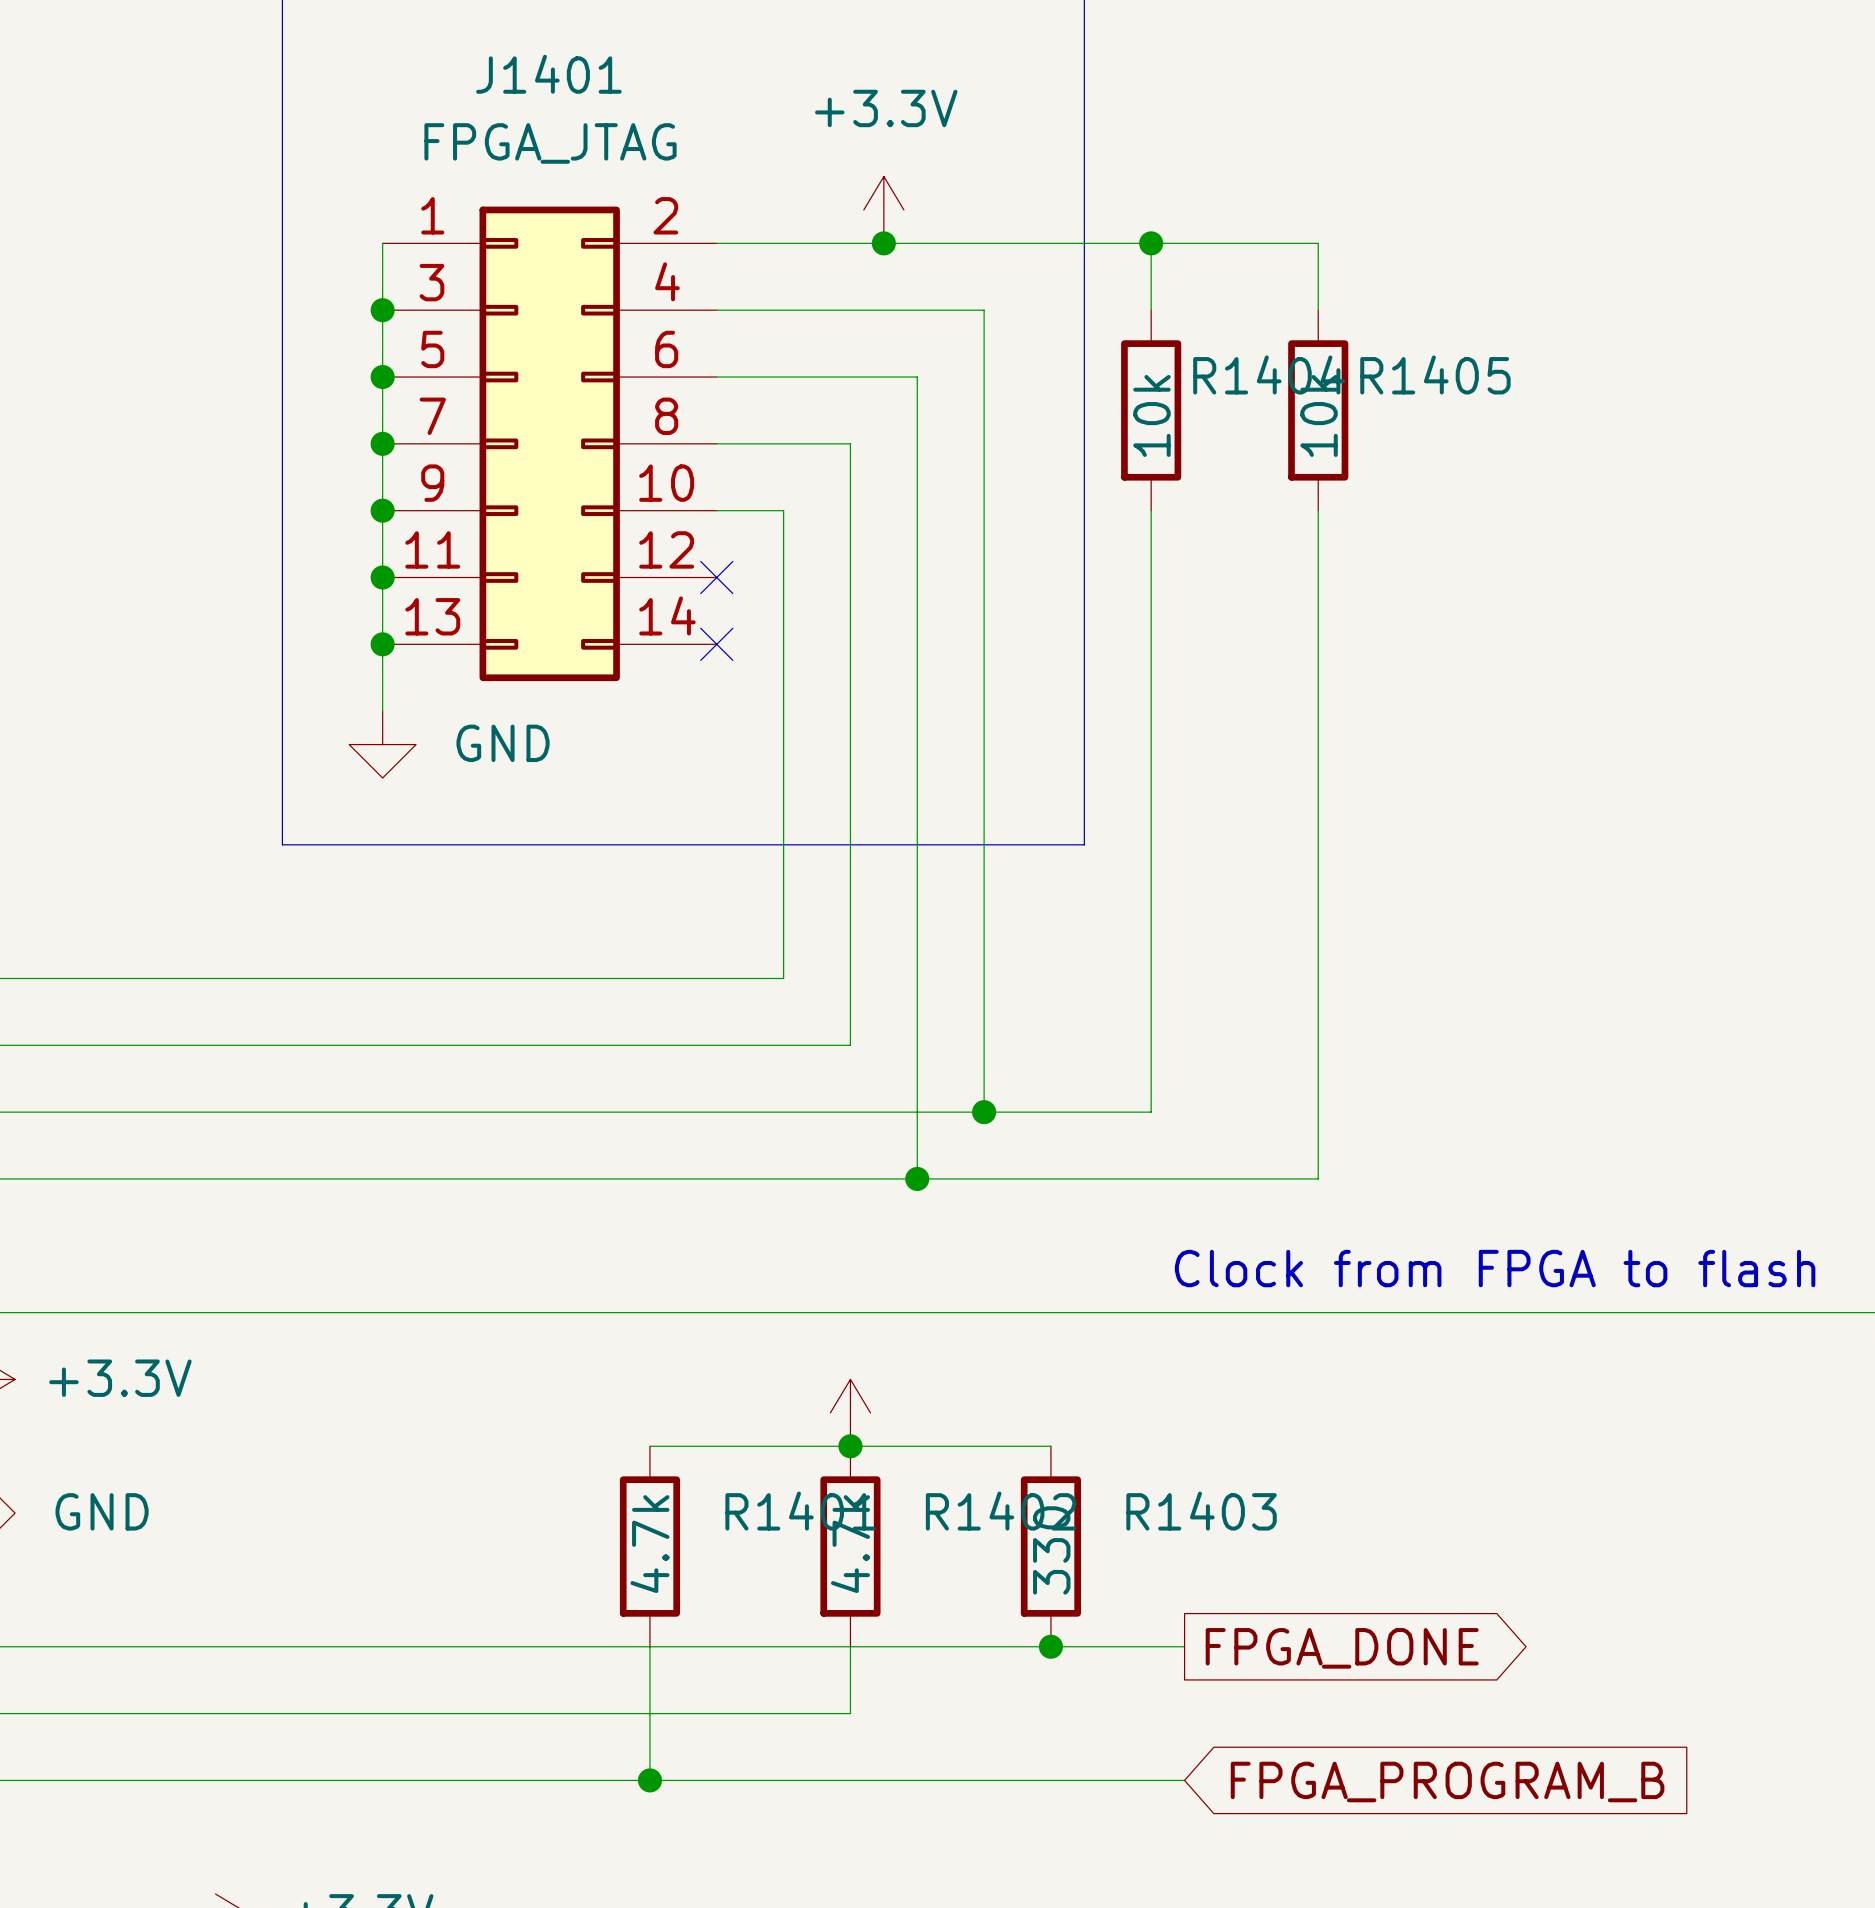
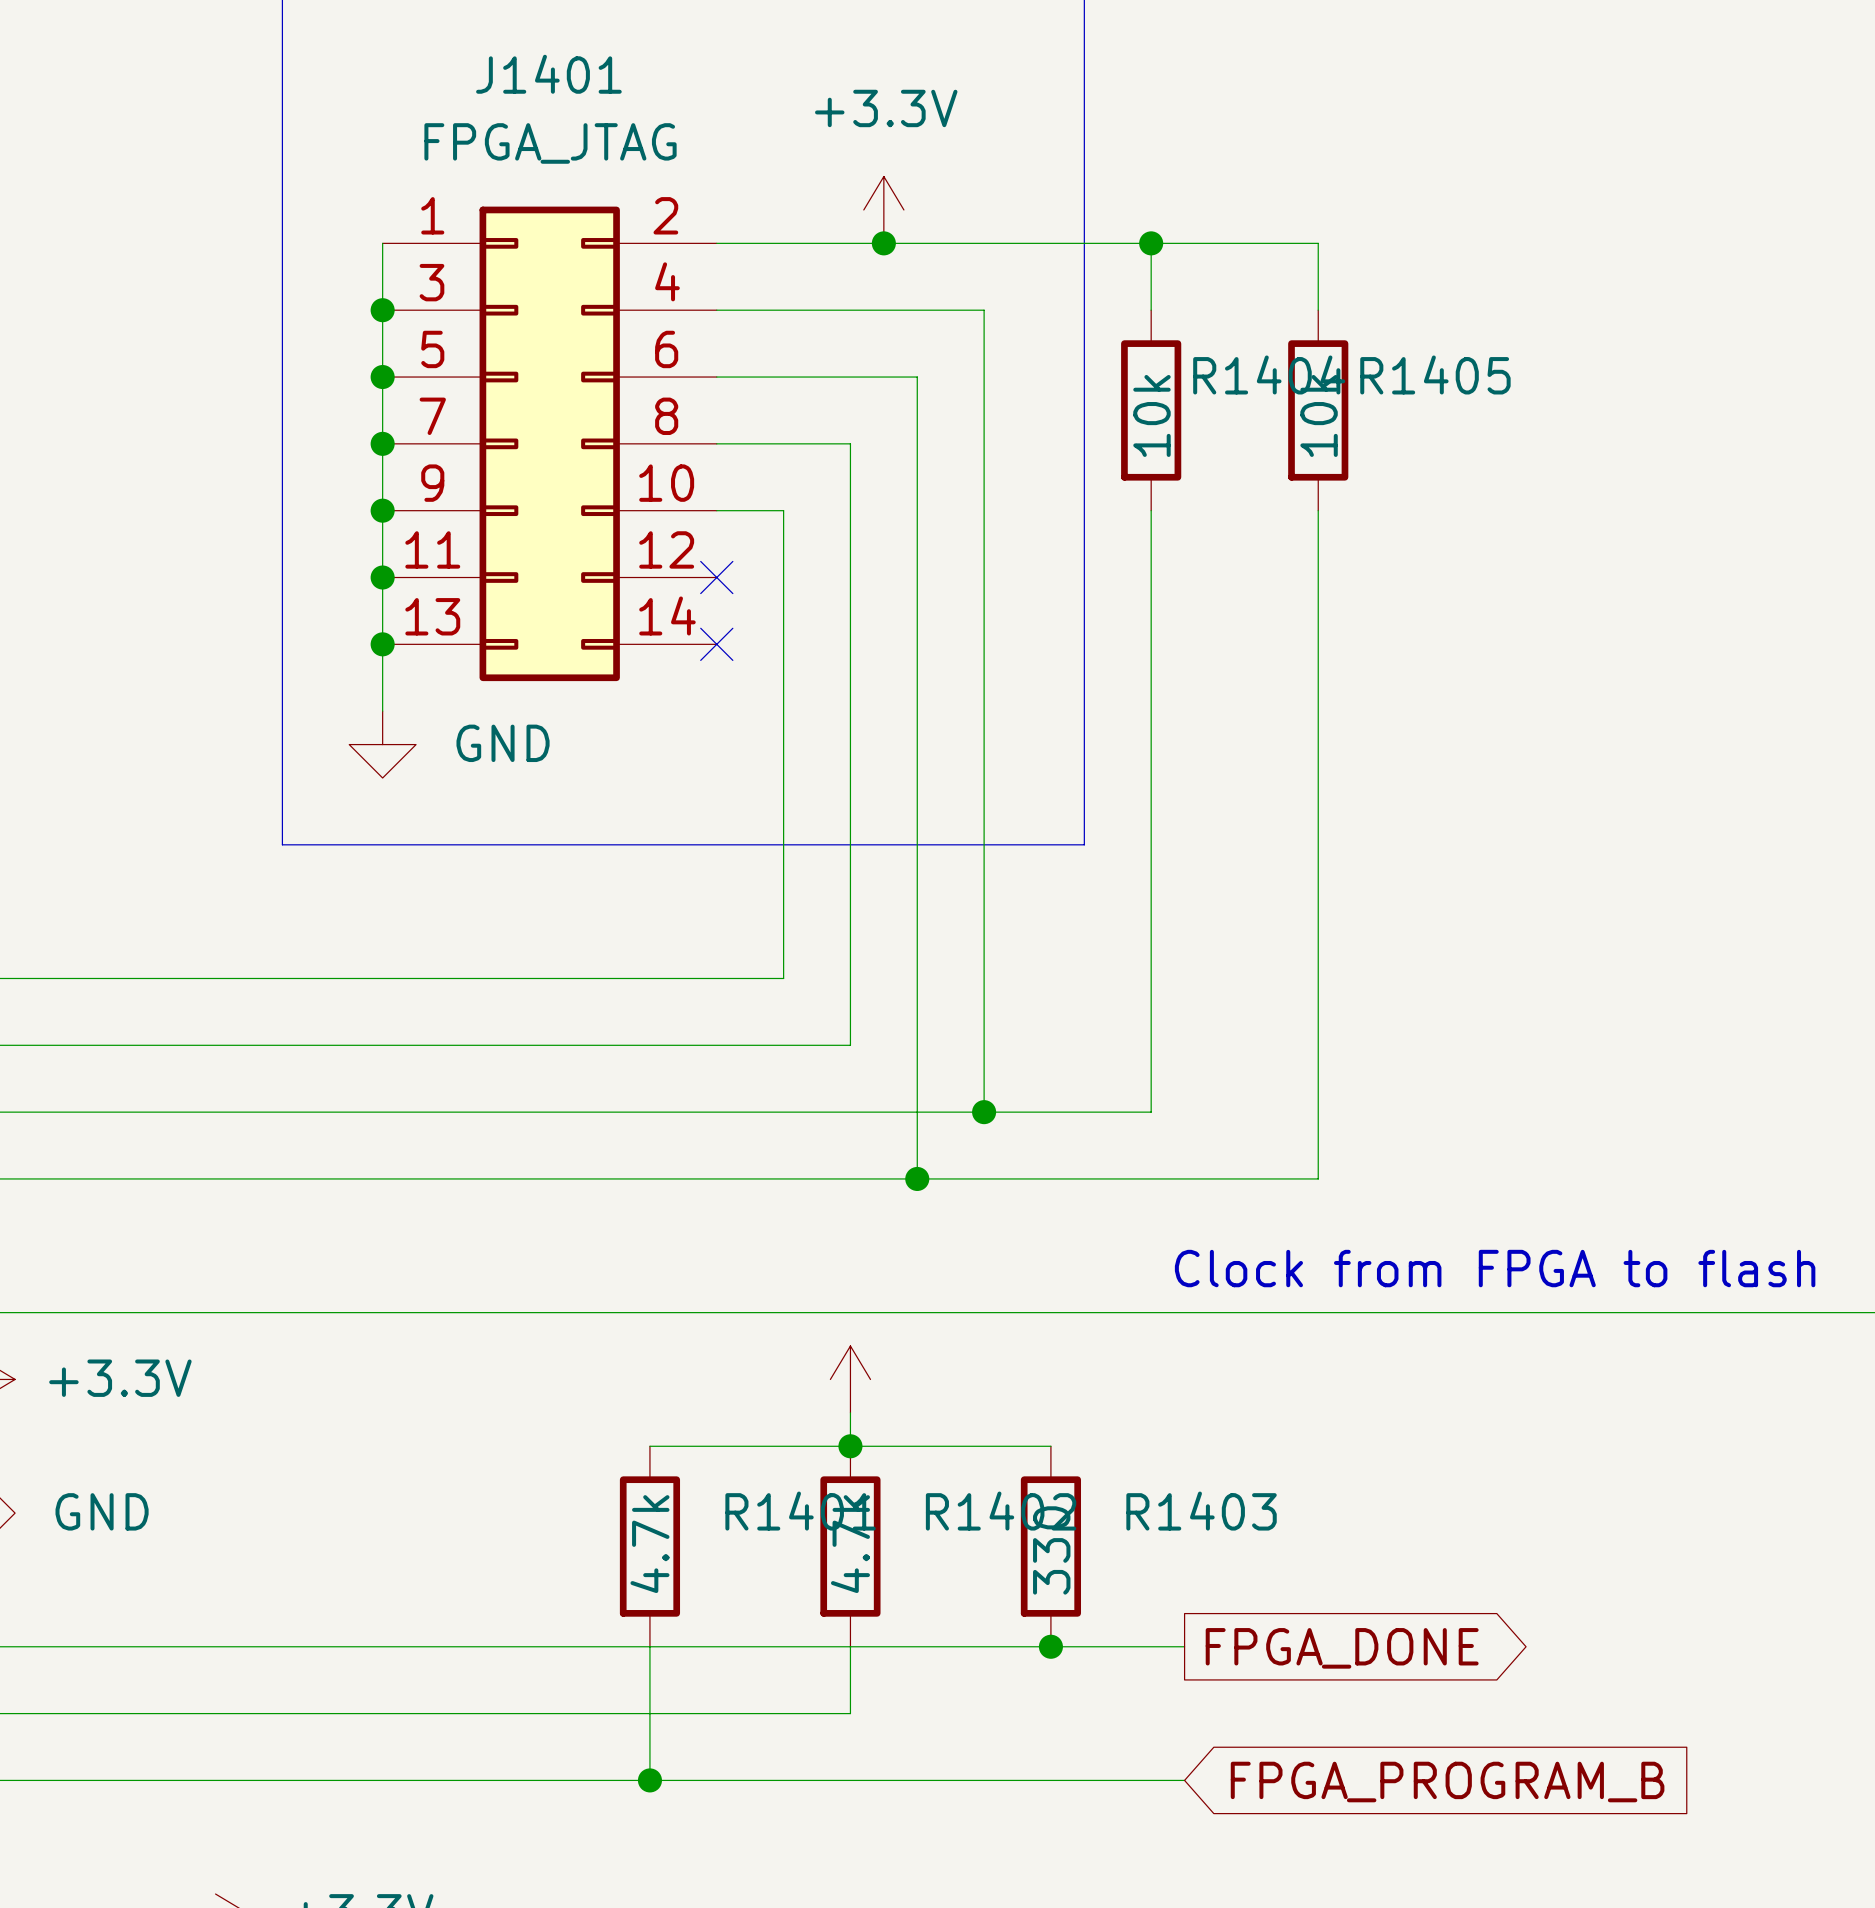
power symbol position: (850, 1412) -> (850, 1379)

